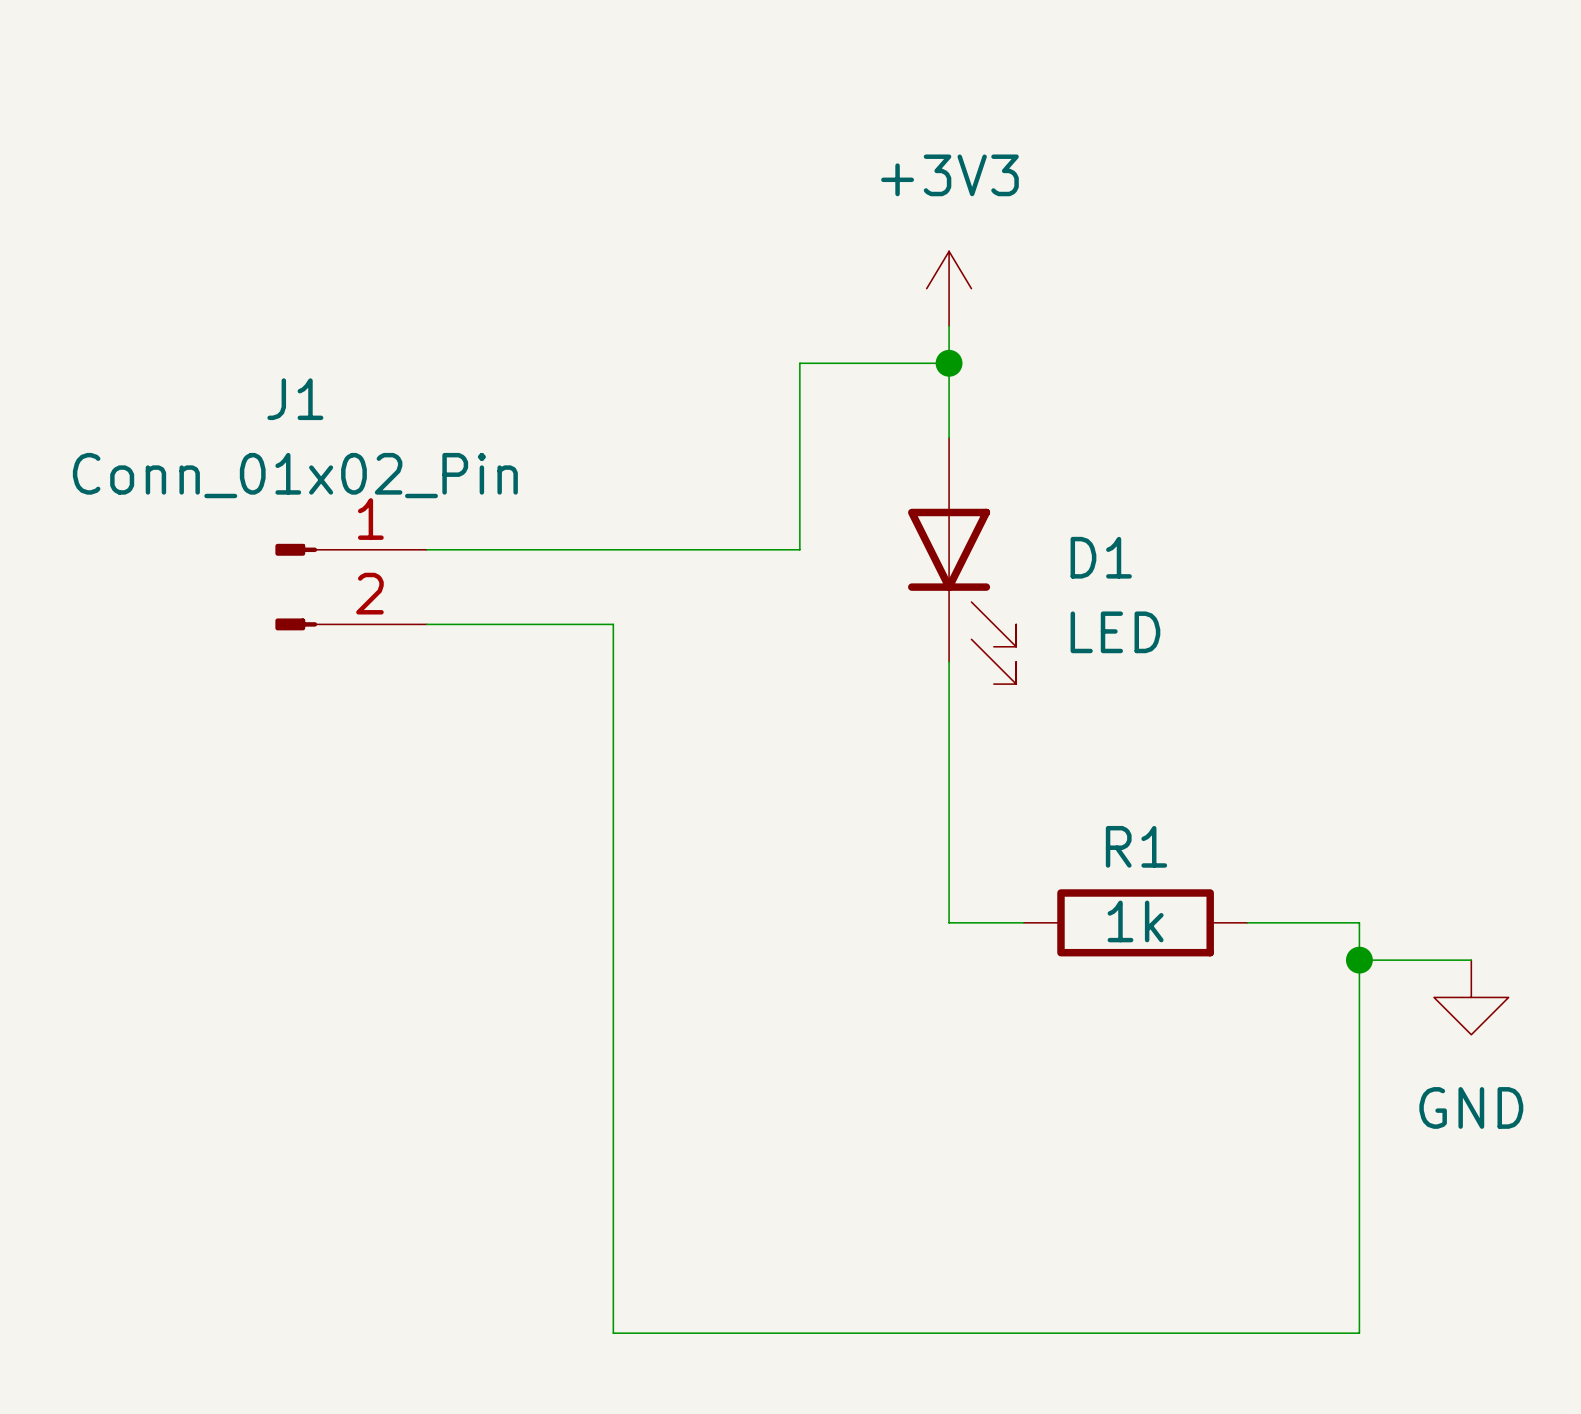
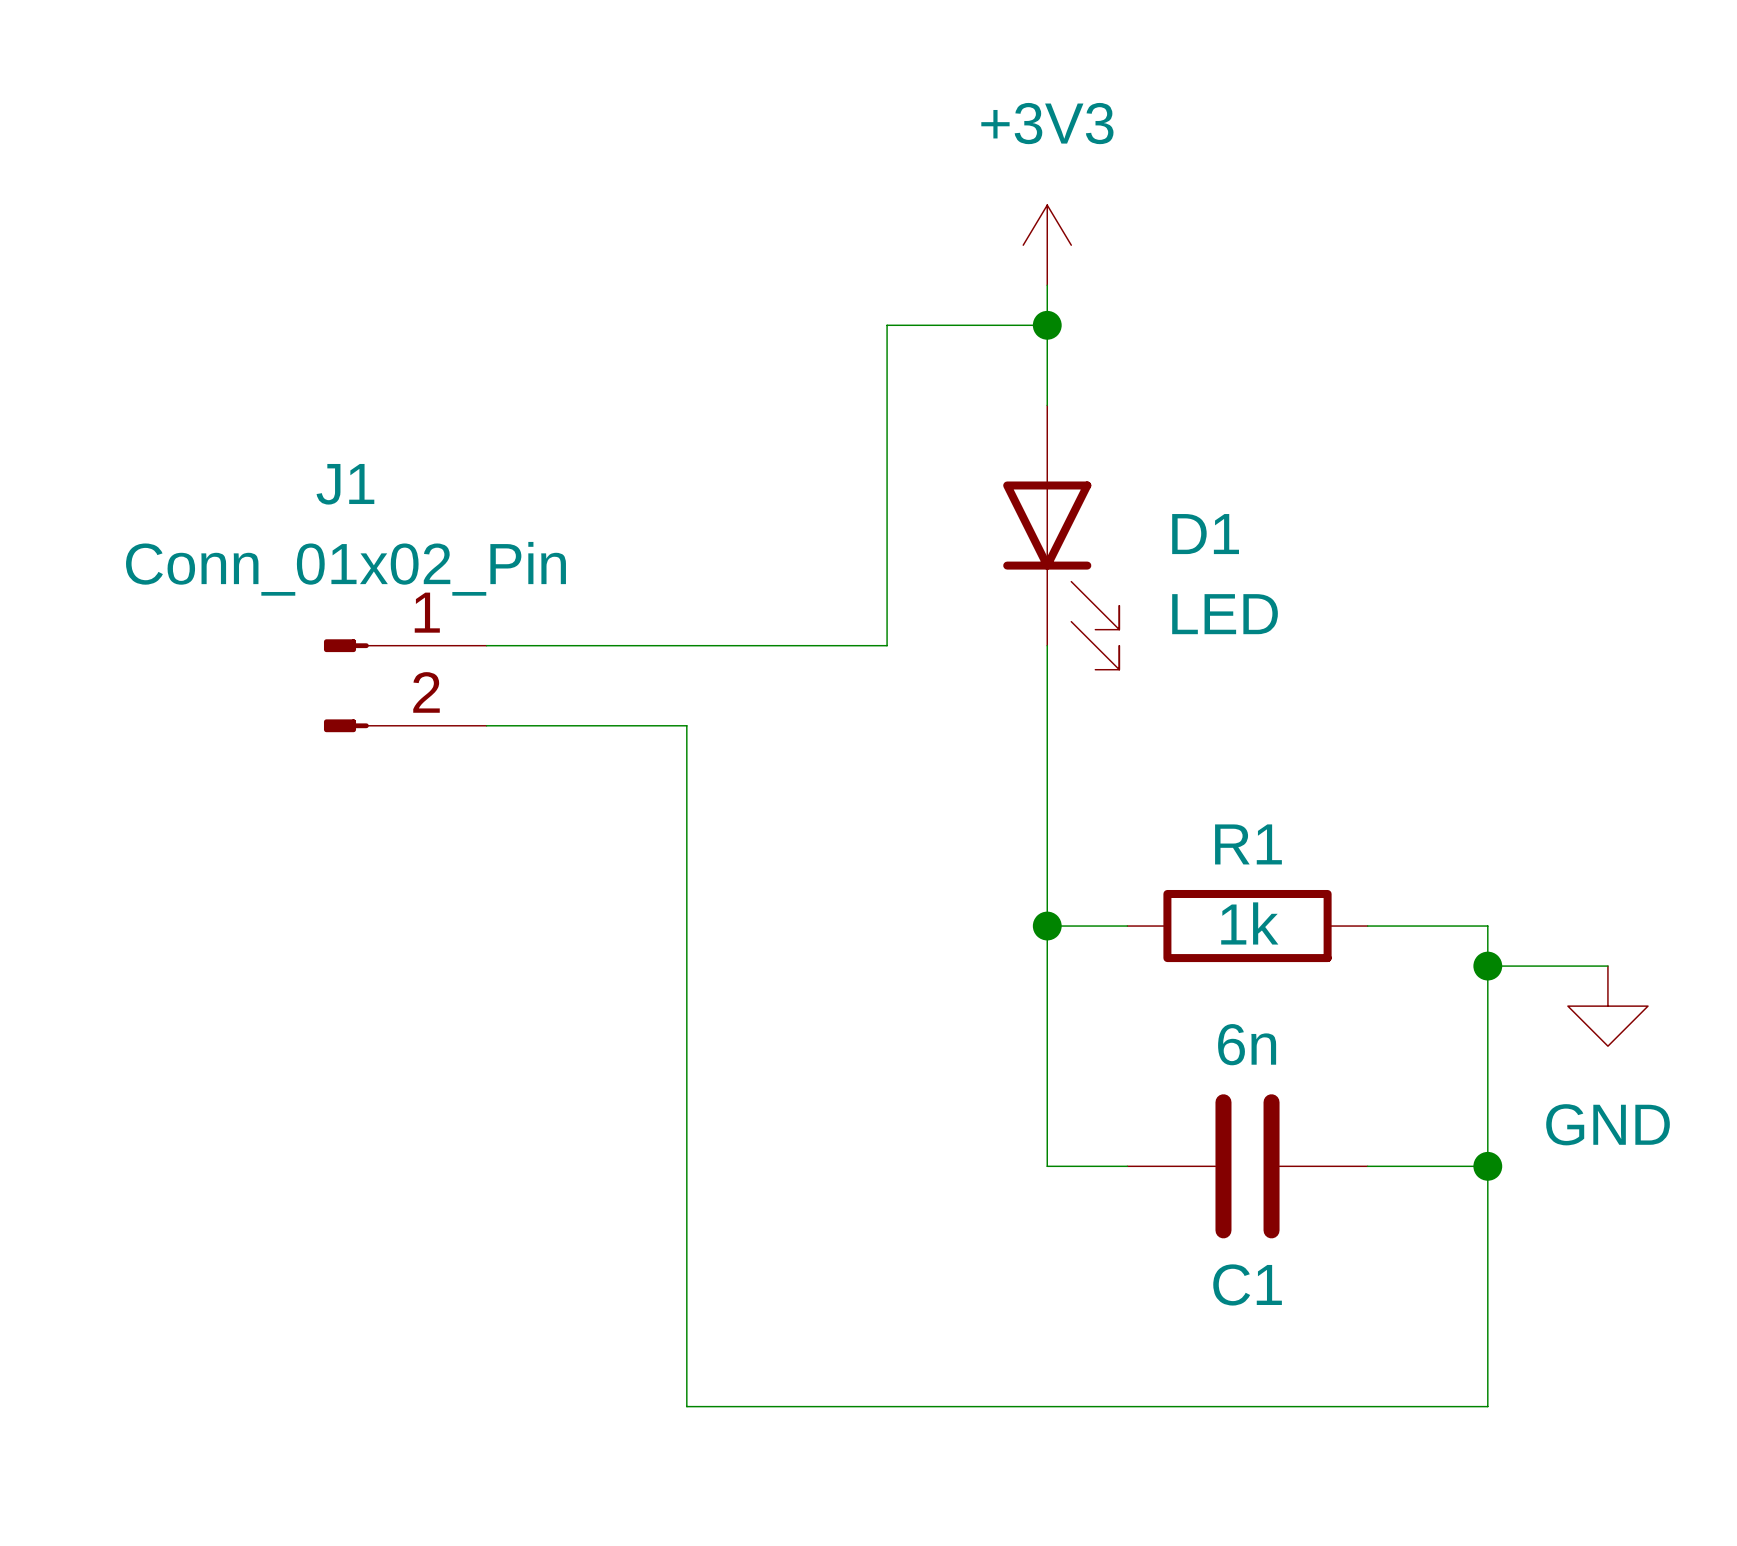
wire: (426, 549) (799, 549) -> (486, 645) (887, 645) (887, 525)
J1 position: (351, 587) -> (405, 685)
wire: (426, 624) (613, 624) (613, 736) -> (486, 725) (686, 725)
wire: none -> (1047, 926) (1047, 1166) (1127, 1166)
junction: none -> (1047, 926)
C1: none -> 6n (1247, 1166)
wire: none -> (1367, 1166) (1487, 1166)
junction: none -> (1487, 1166)
wire: (613, 1333) (1359, 1333) -> (686, 1366) (686, 1406) (1487, 1406) (1487, 1366)

